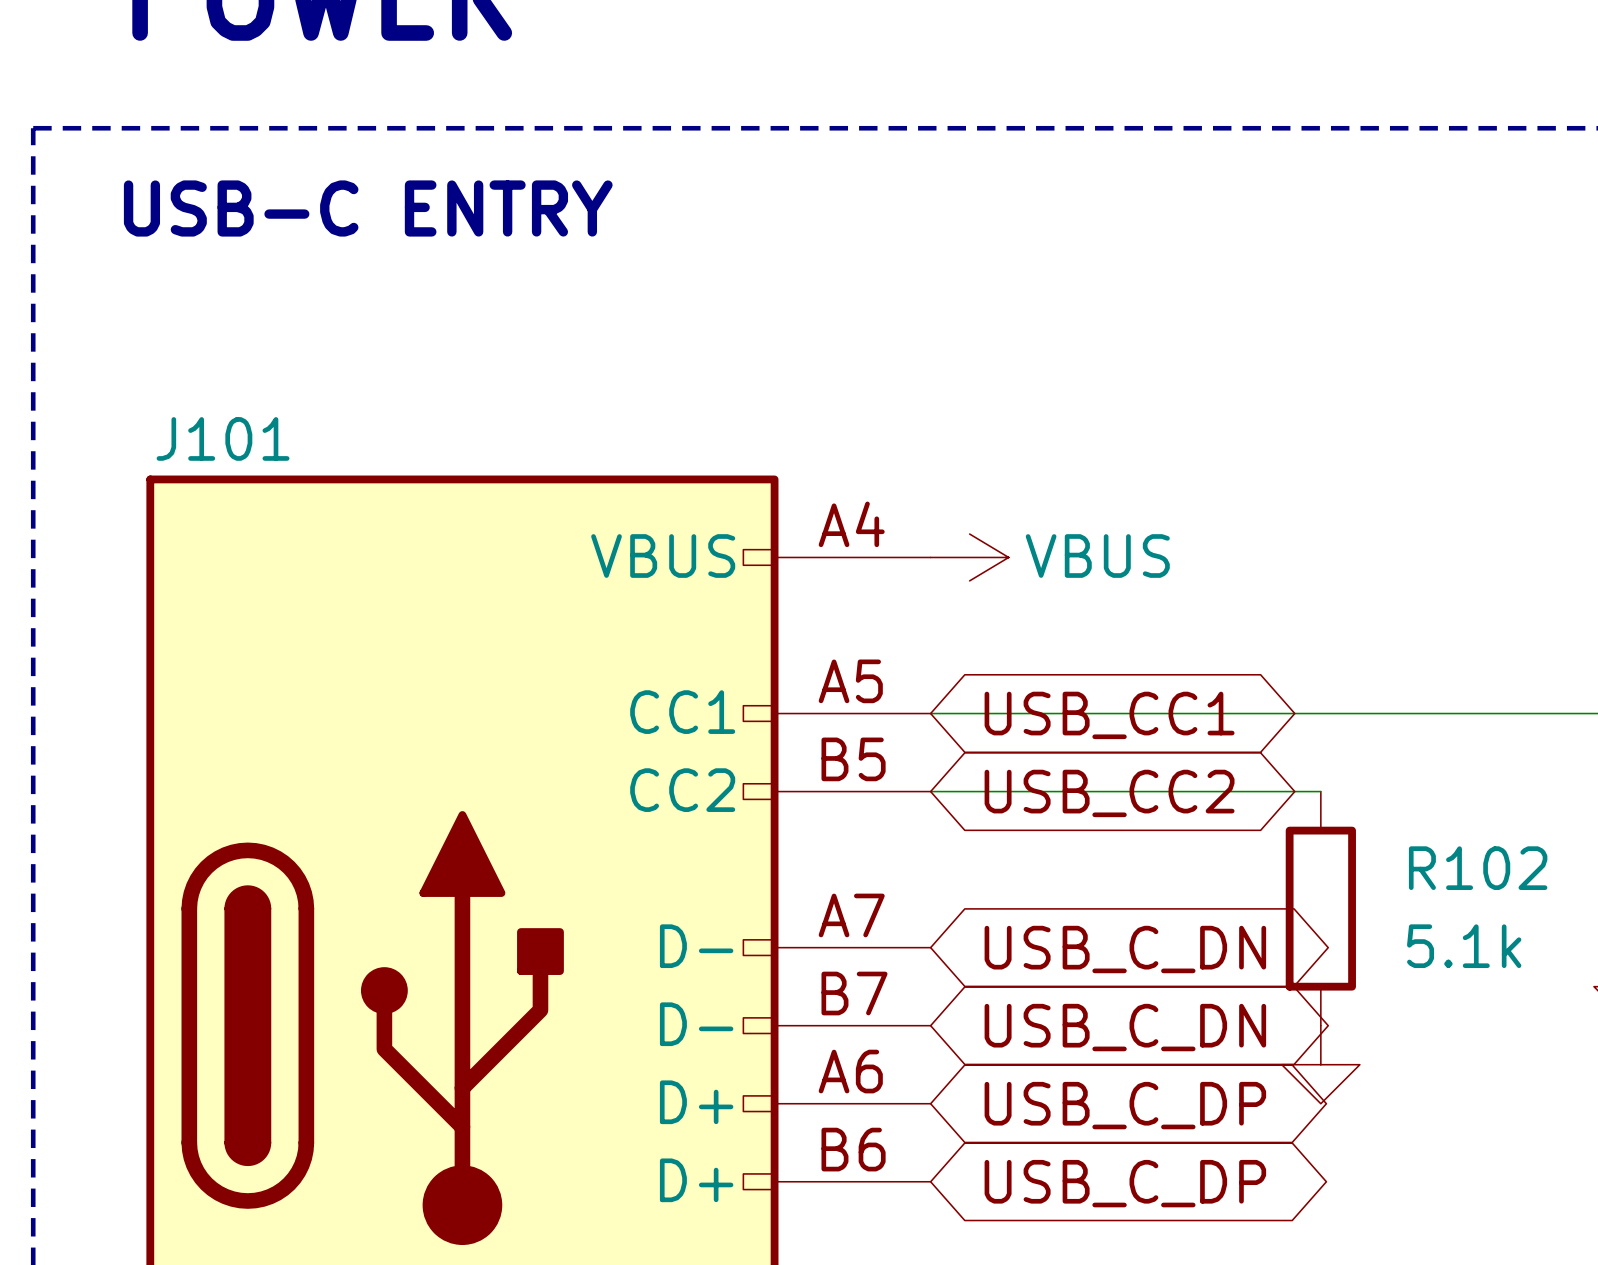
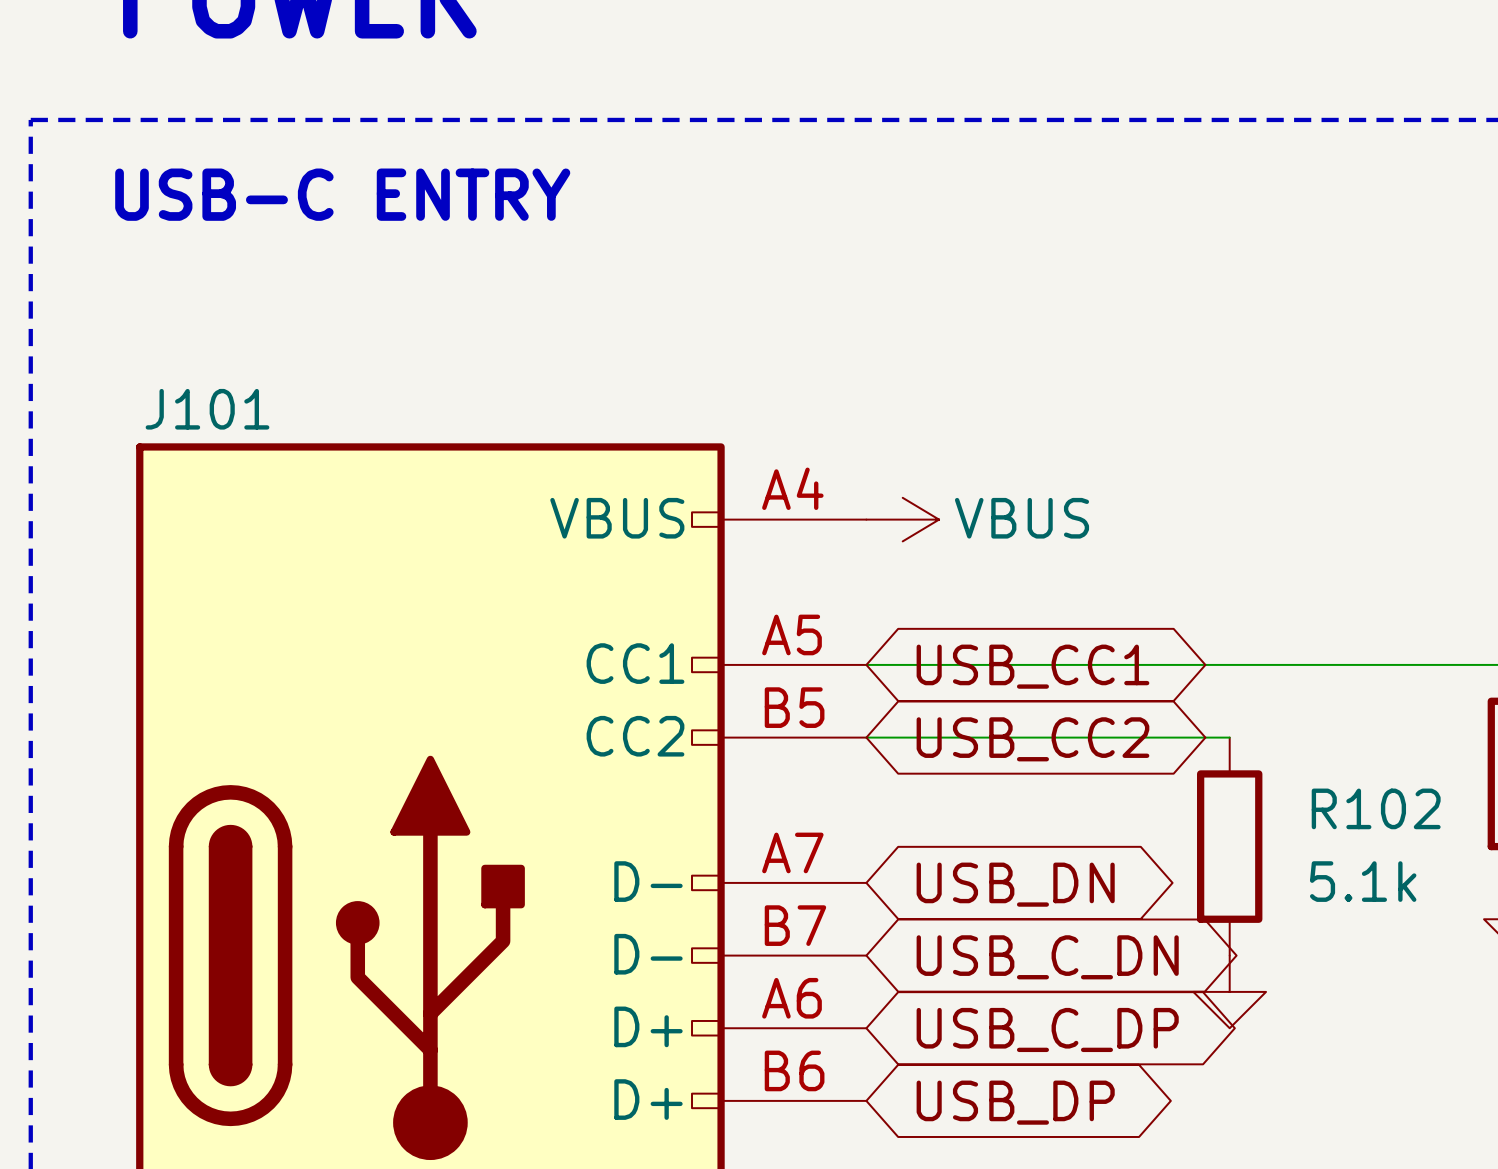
global label: USB_C_DN (1125, 949) -> USB_DN (1015, 884)
global label: USB_C_DP (1125, 1183) -> USB_DP (1015, 1102)

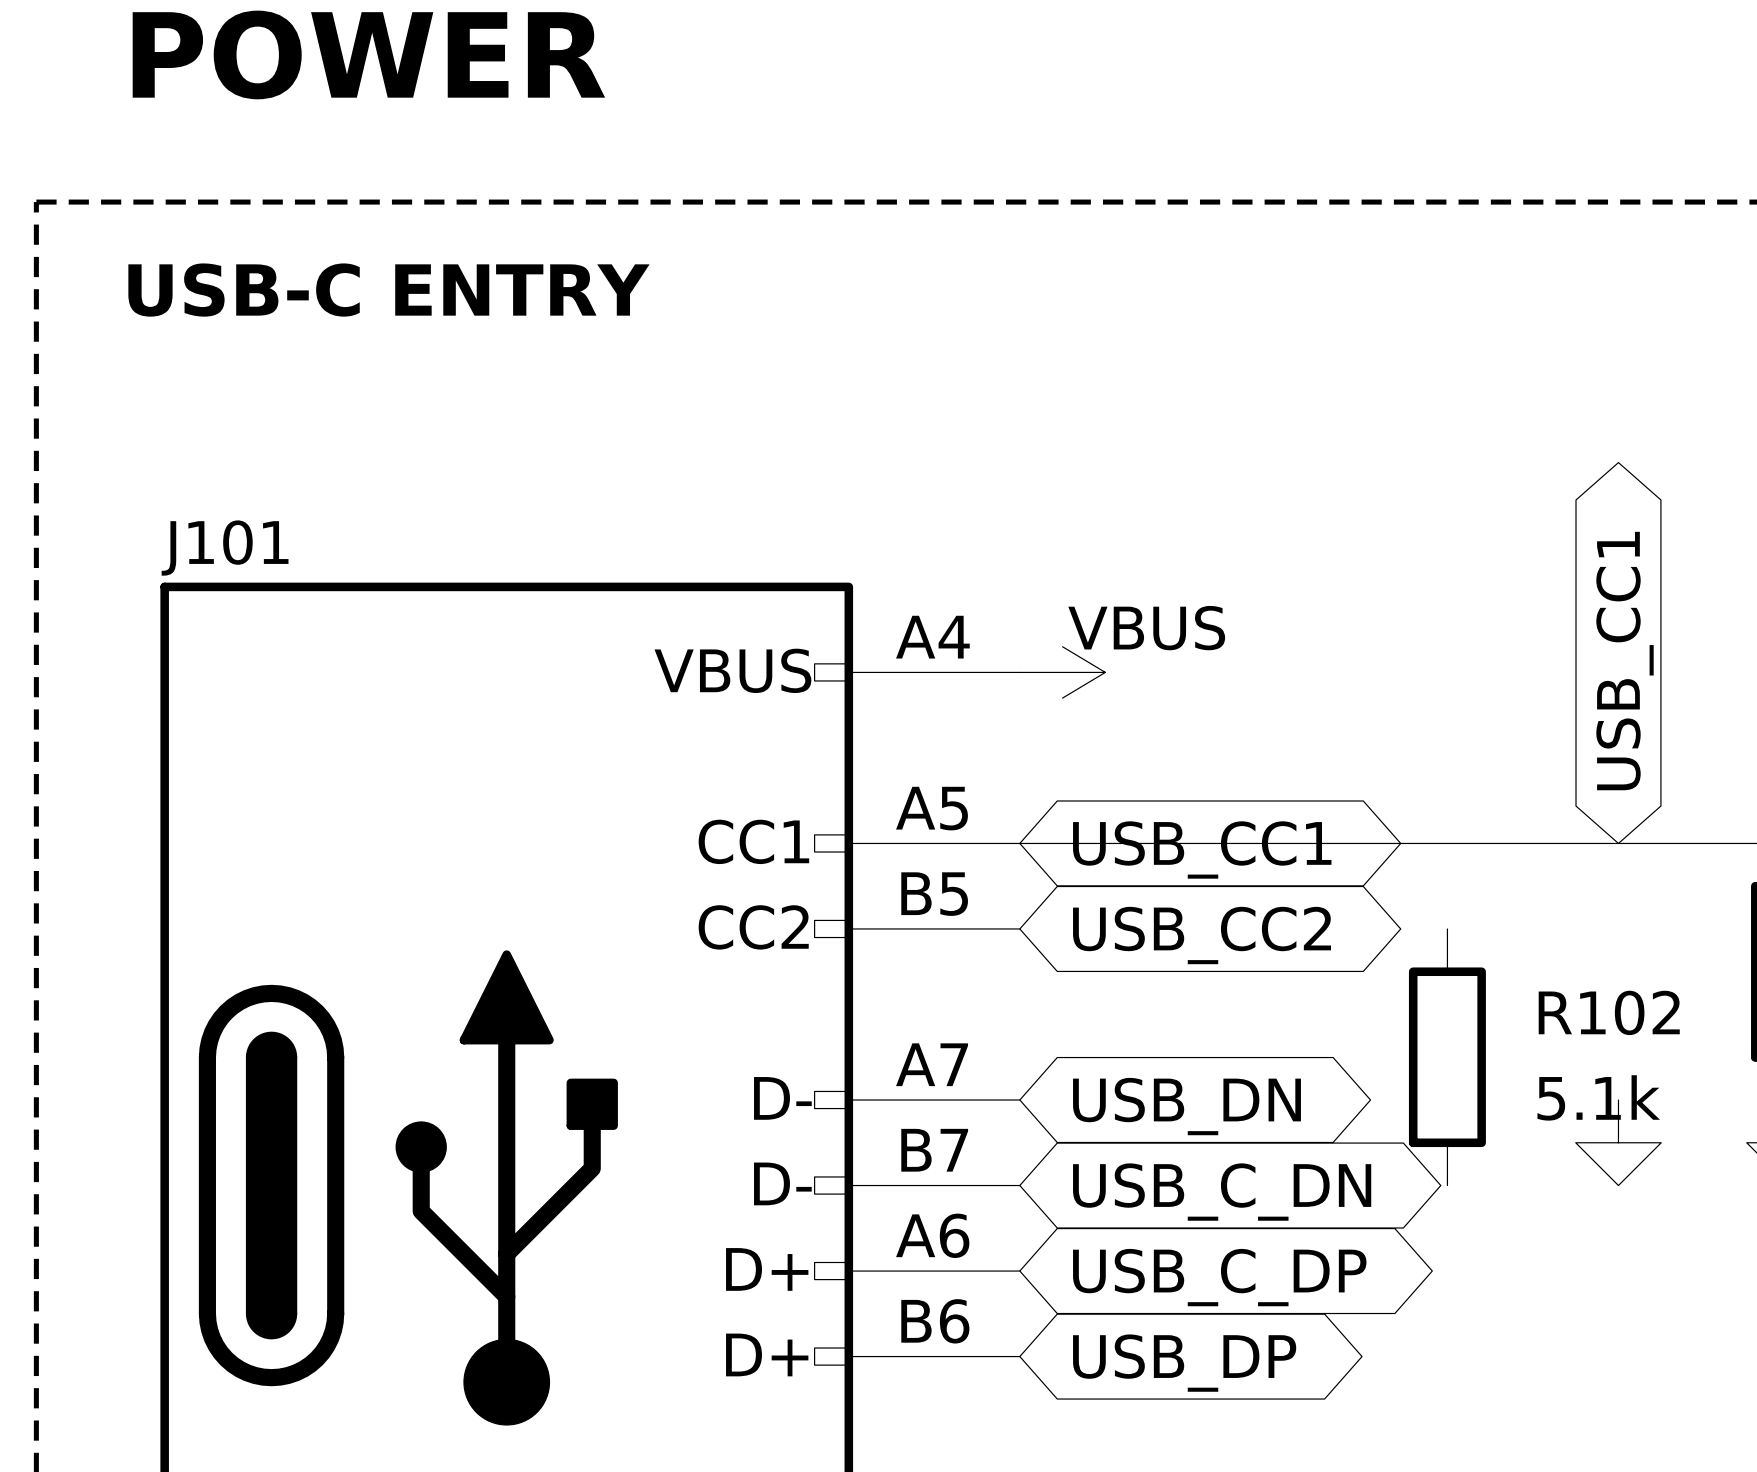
global label: none -> USB_CC1 (1625, 661)
power symbol text position: VBUS (1022, 518) -> VBUS (1146, 628)
wire: (866, 737) (1229, 737) -> none
power symbol position: (1229, 991) -> (1618, 1142)

